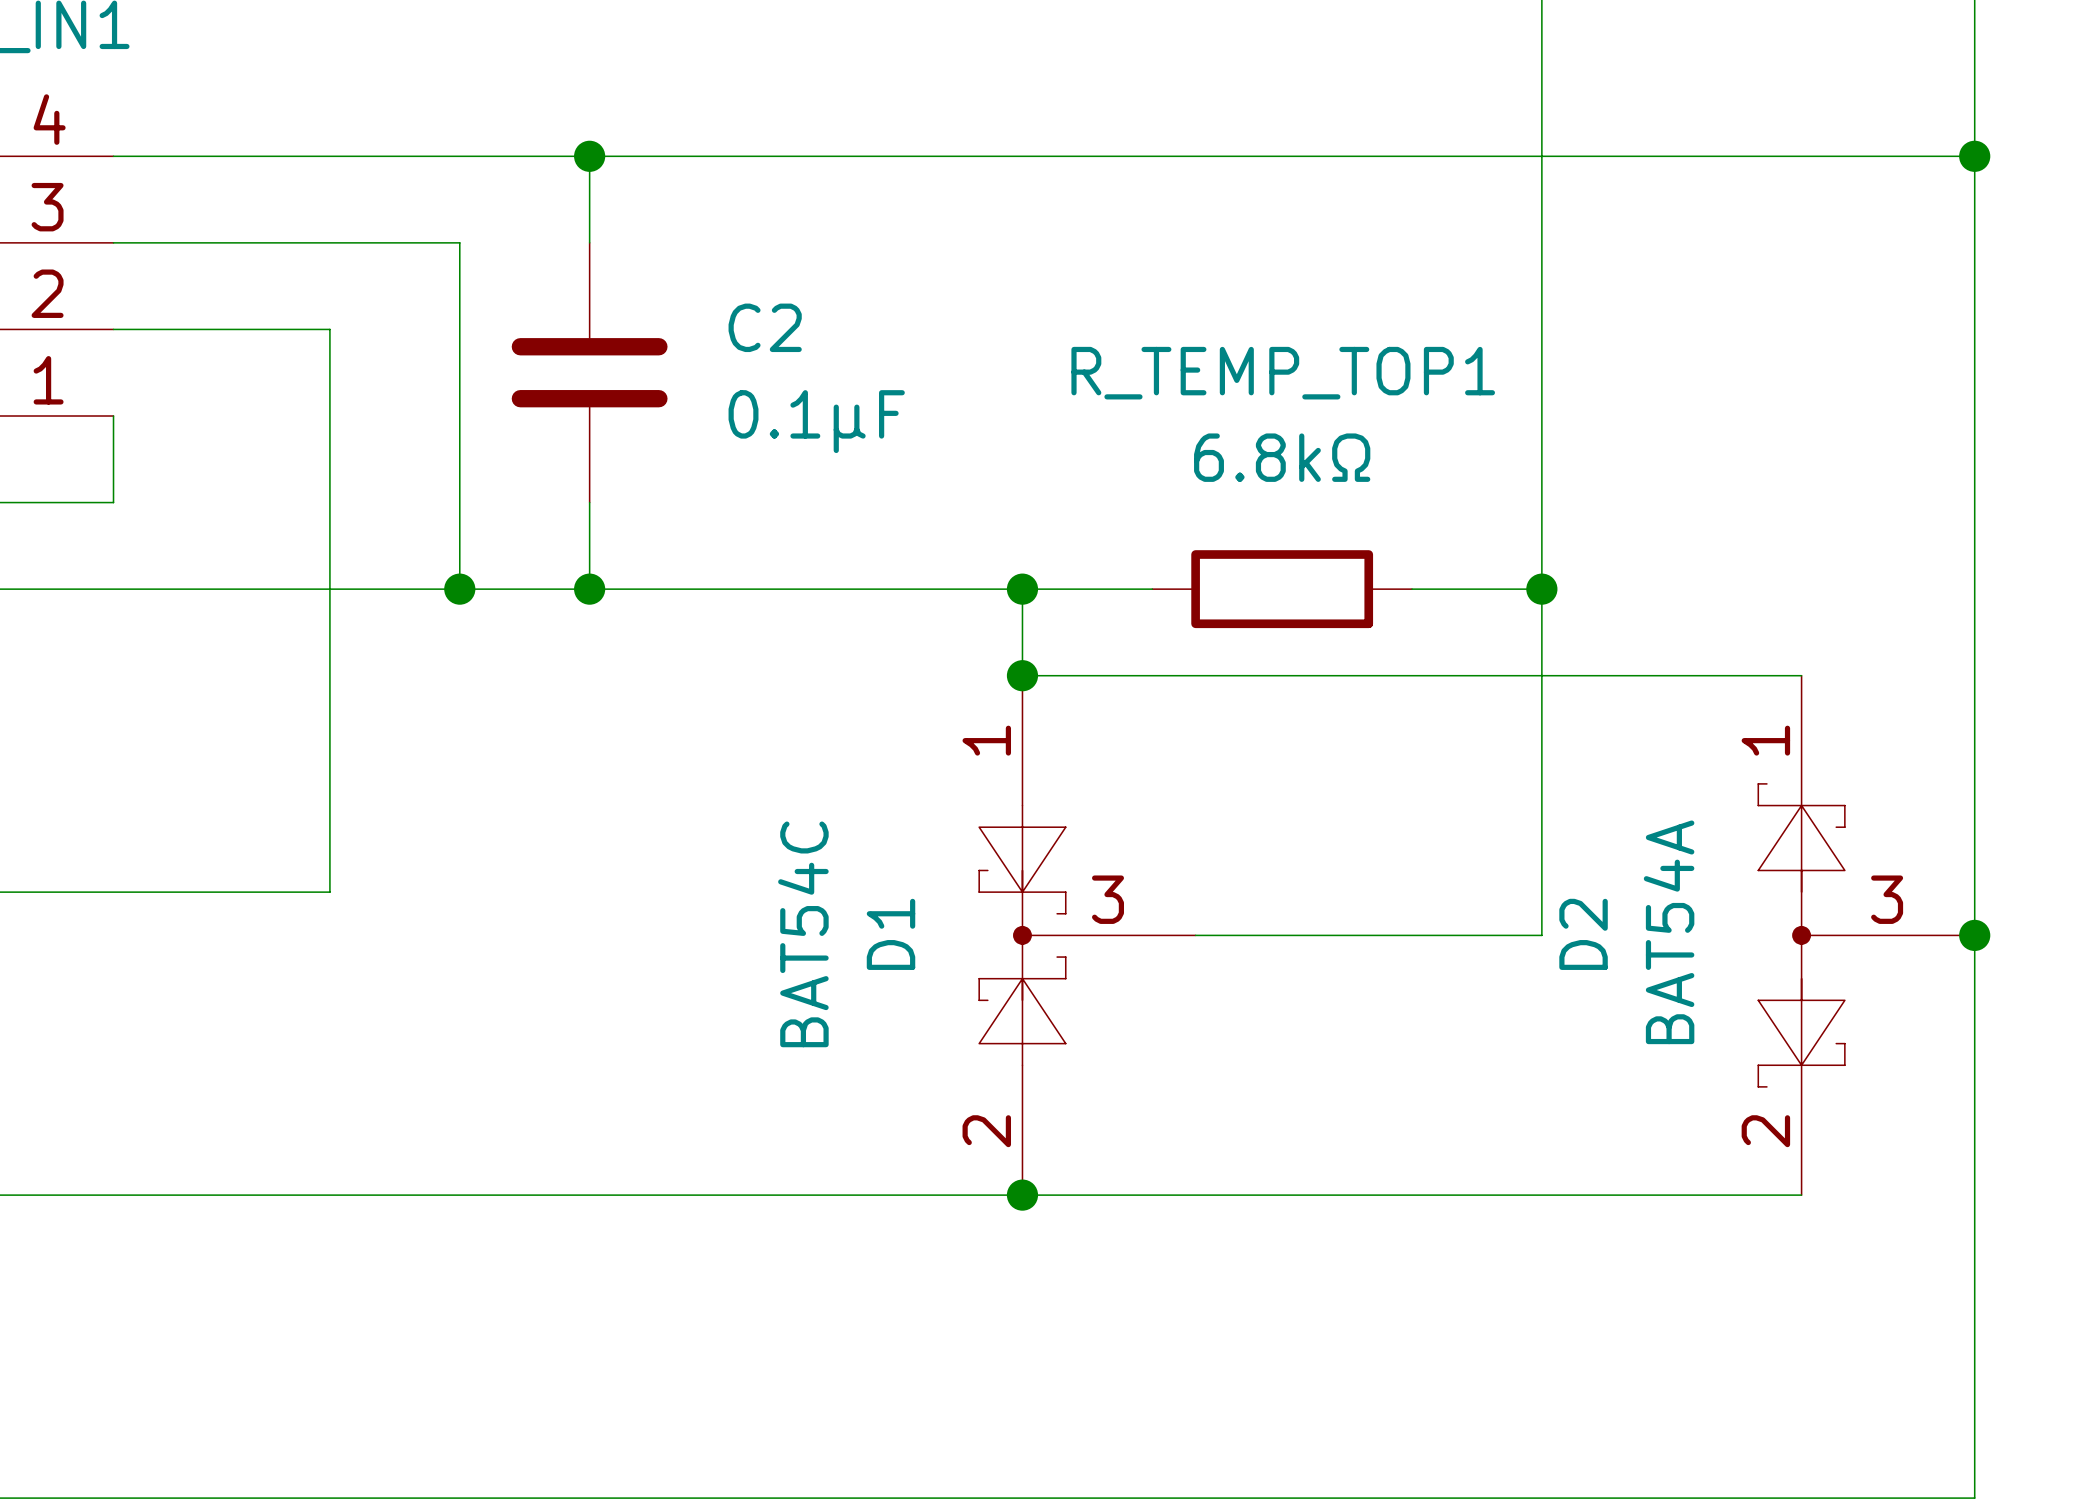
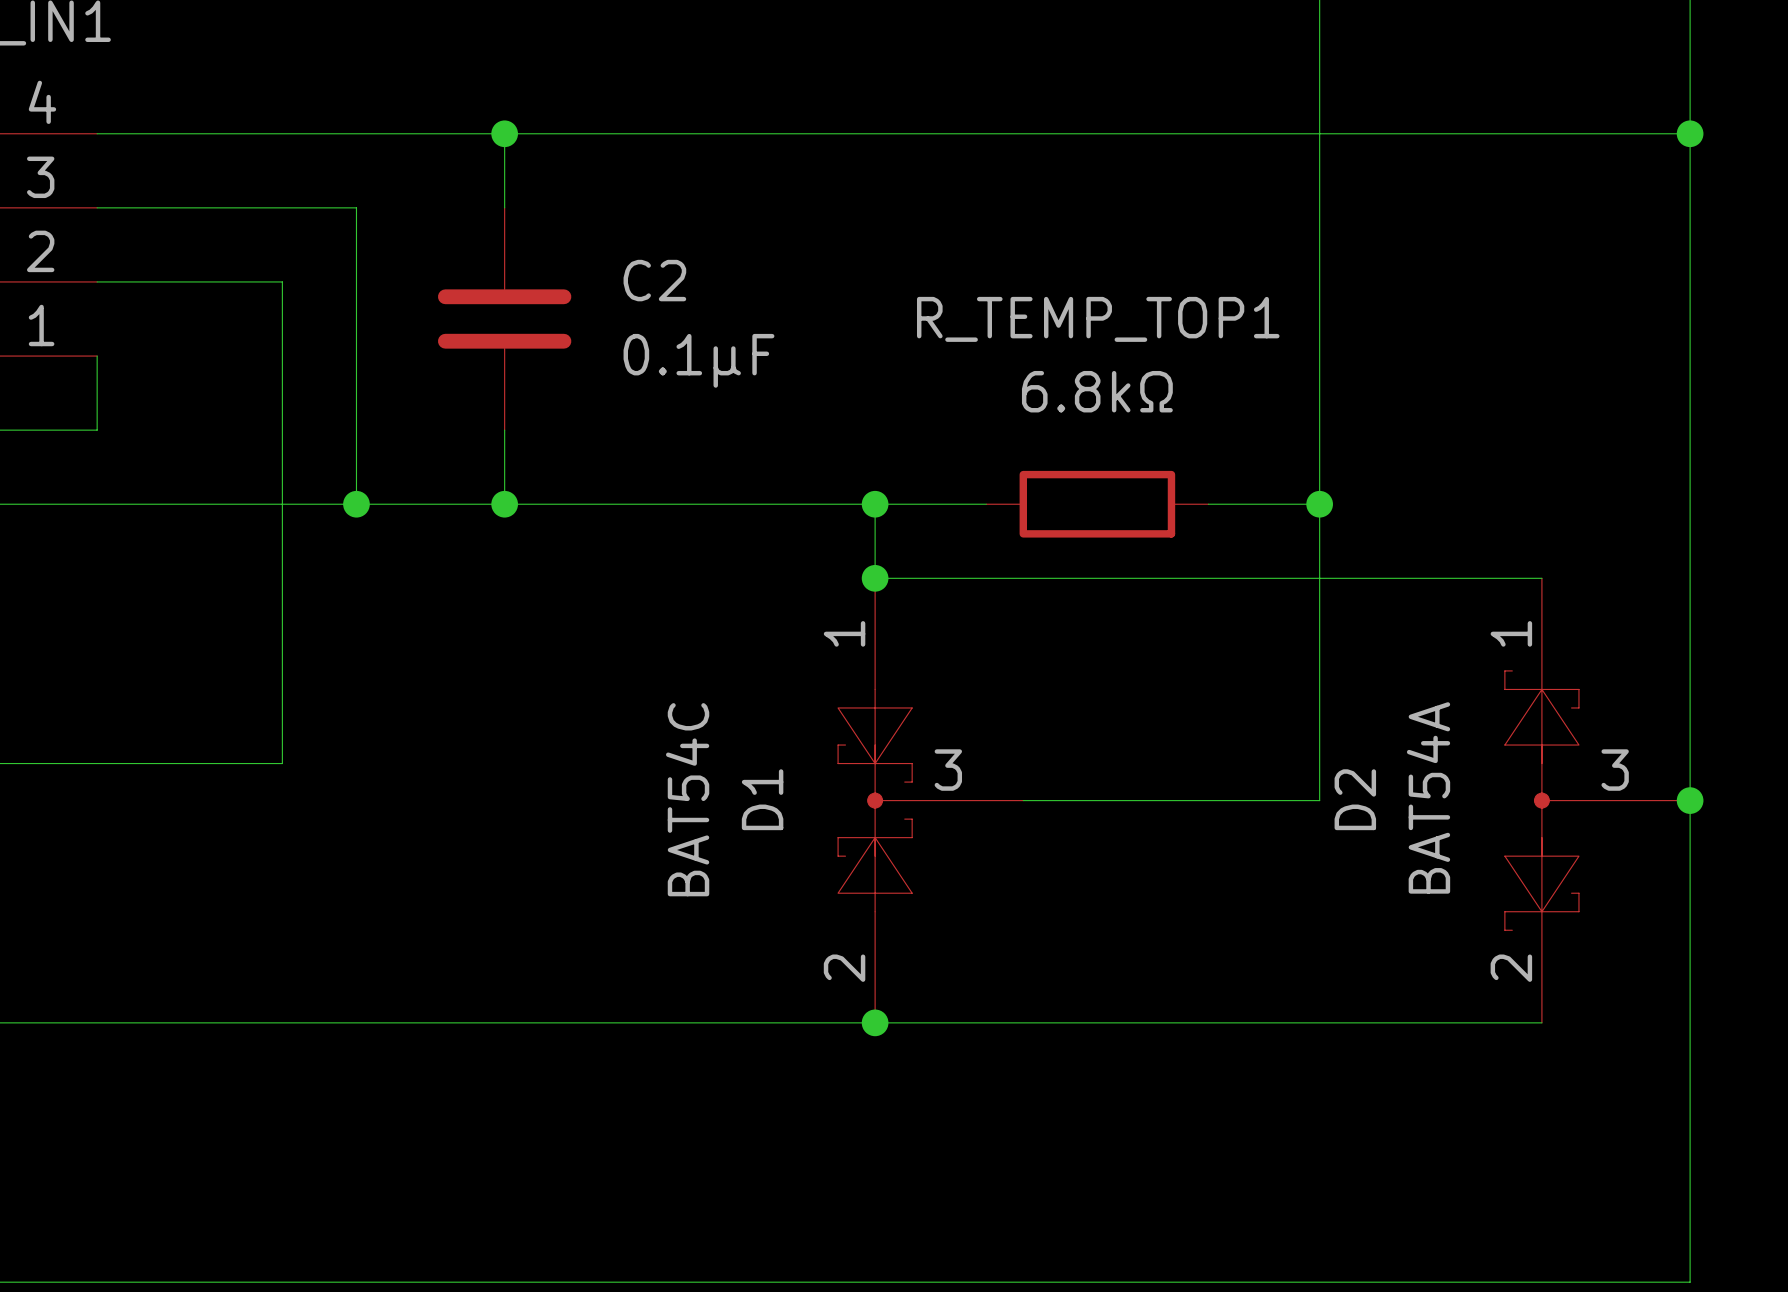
wire: (416, 242) (459, 242) (459, 589) -> (356, 207) (356, 504)
junction position: (459, 589) -> (356, 504)

